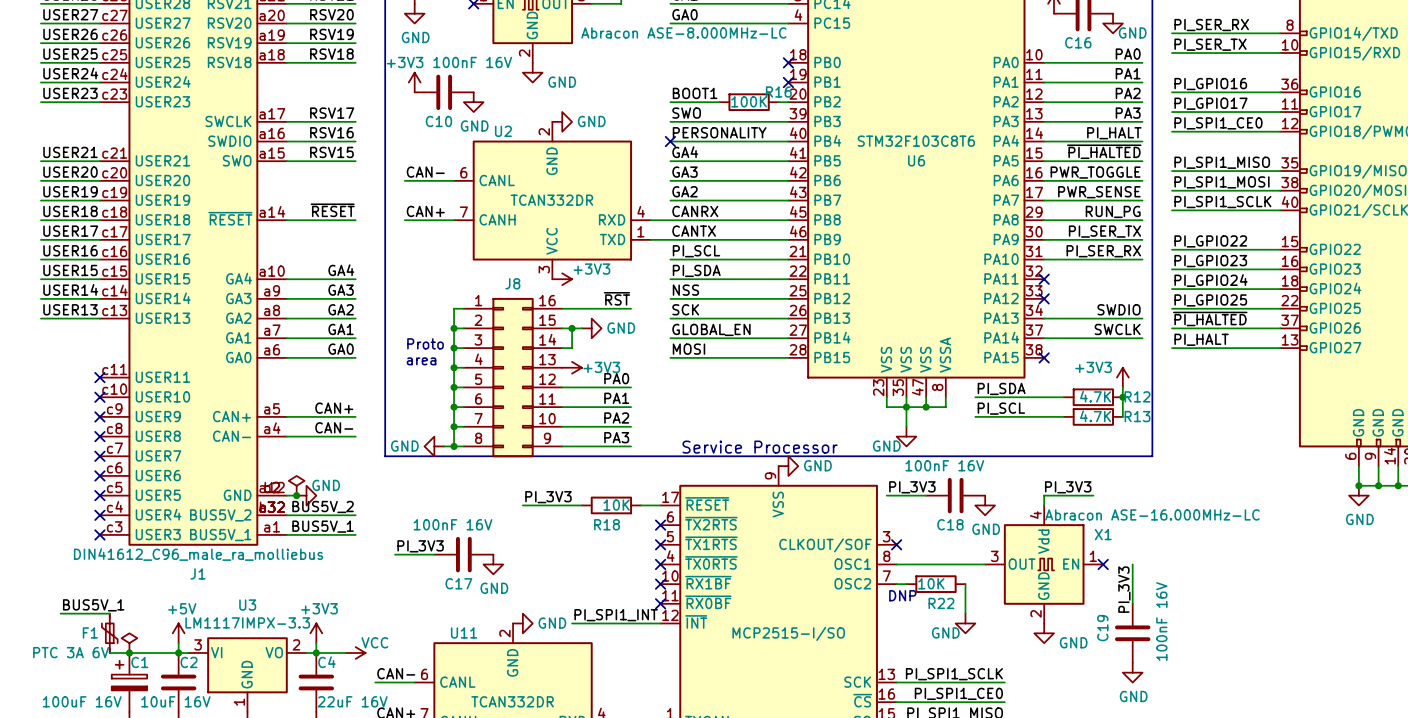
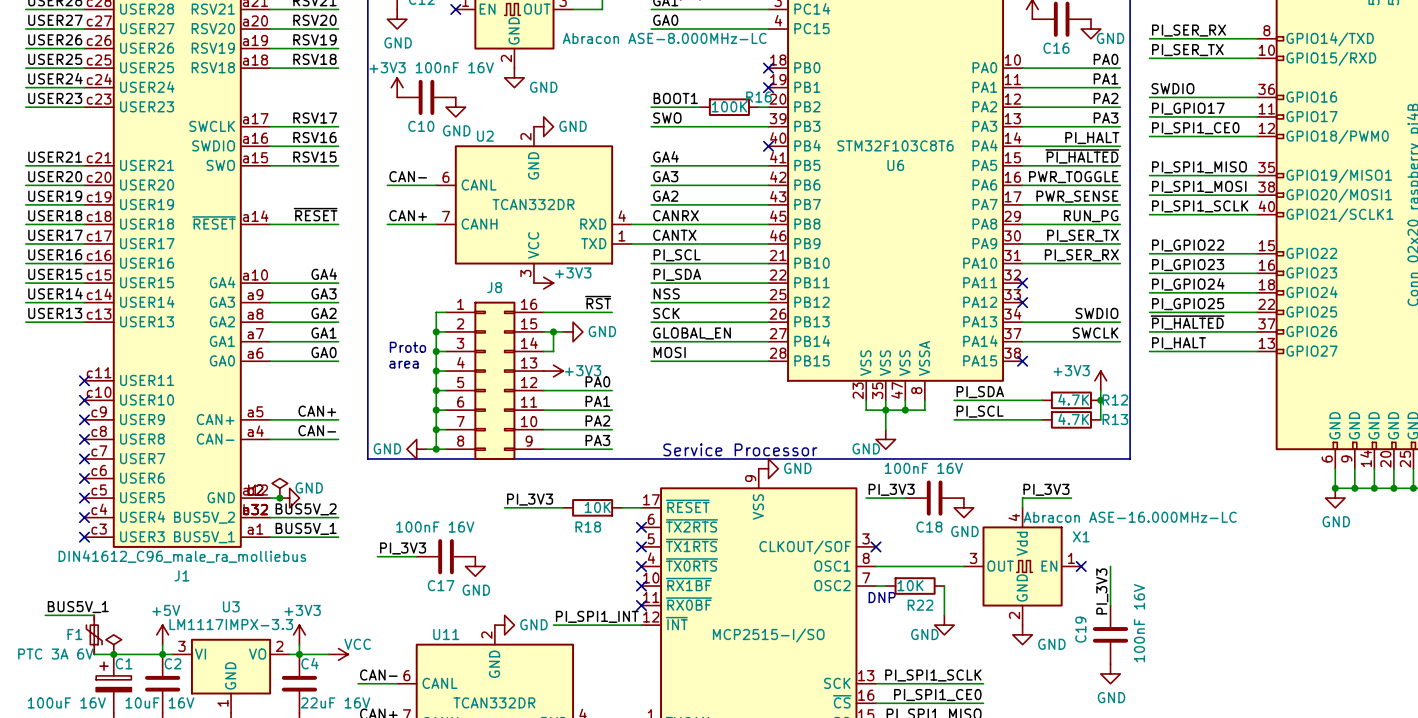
label: PI_GPIO16 (1210, 84) -> SWDIO (1172, 88)
label: PERSONALITY (719, 132) -> none
wire: (670, 141) (788, 141) -> none
no-connect mark: (670, 141) -> none
no-connect mark: none -> (768, 146)

